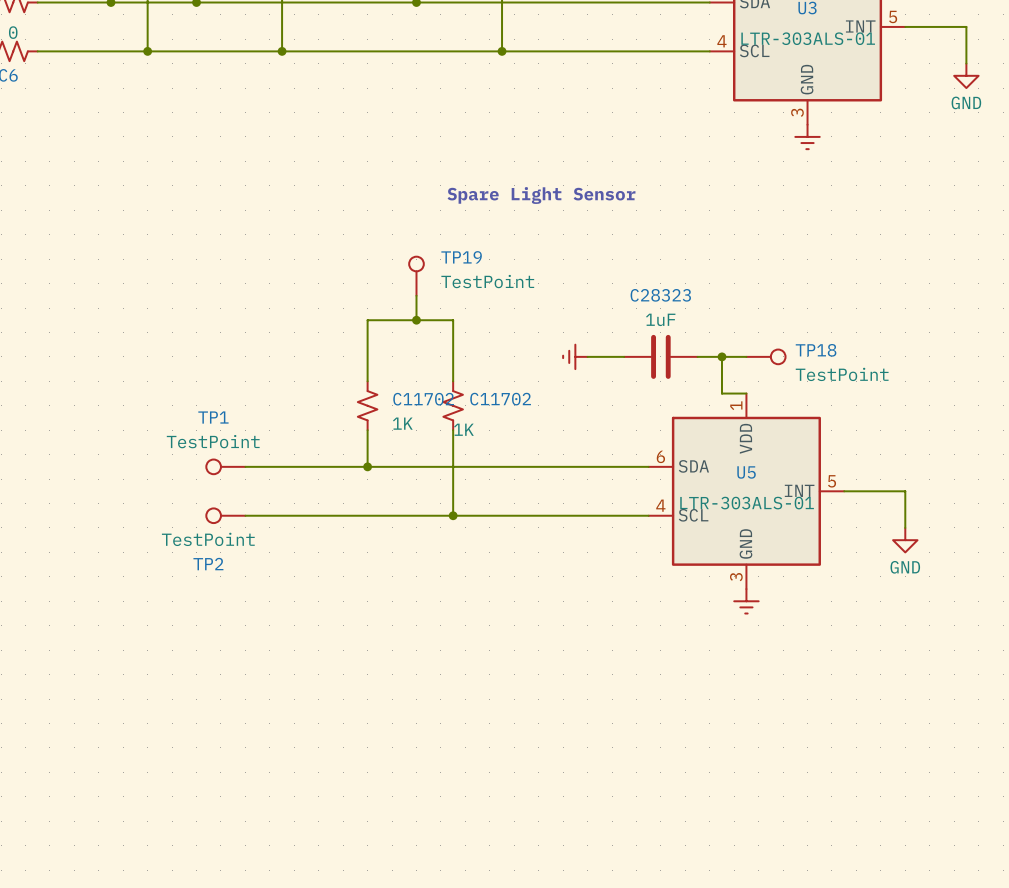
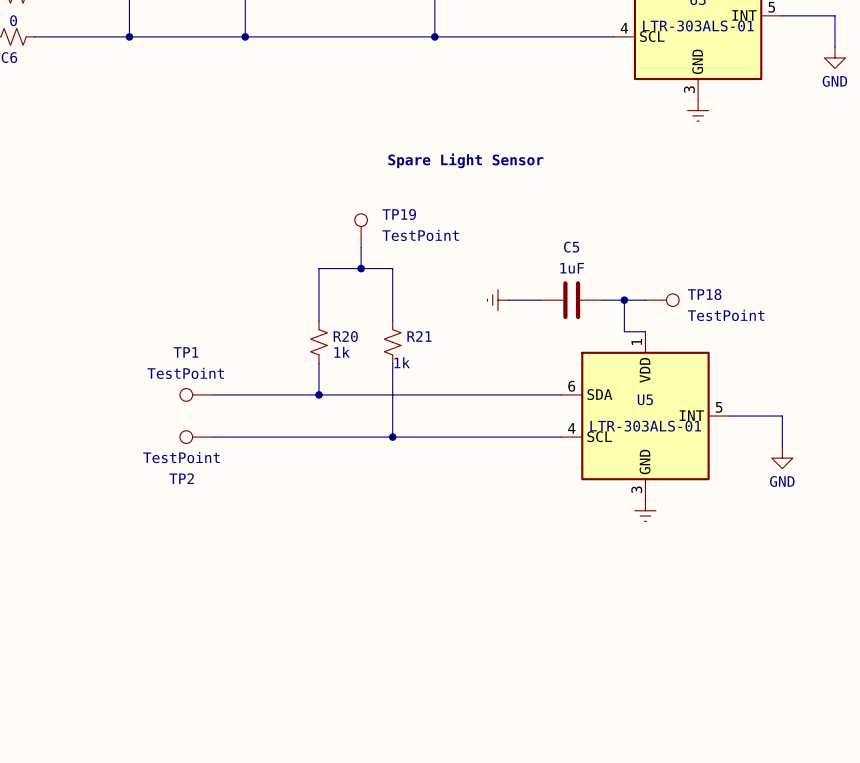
C28323 name: C28323 (660, 295) -> C5 (571, 247)
C11702 name: C11702 (423, 399) -> R20 (345, 336)
C11702 name: C11702 (500, 399) -> R21 (419, 336)
C11702 value: 1K (402, 423) -> 1k (342, 352)
C11702 value: 1K (463, 429) -> 1k (402, 362)

